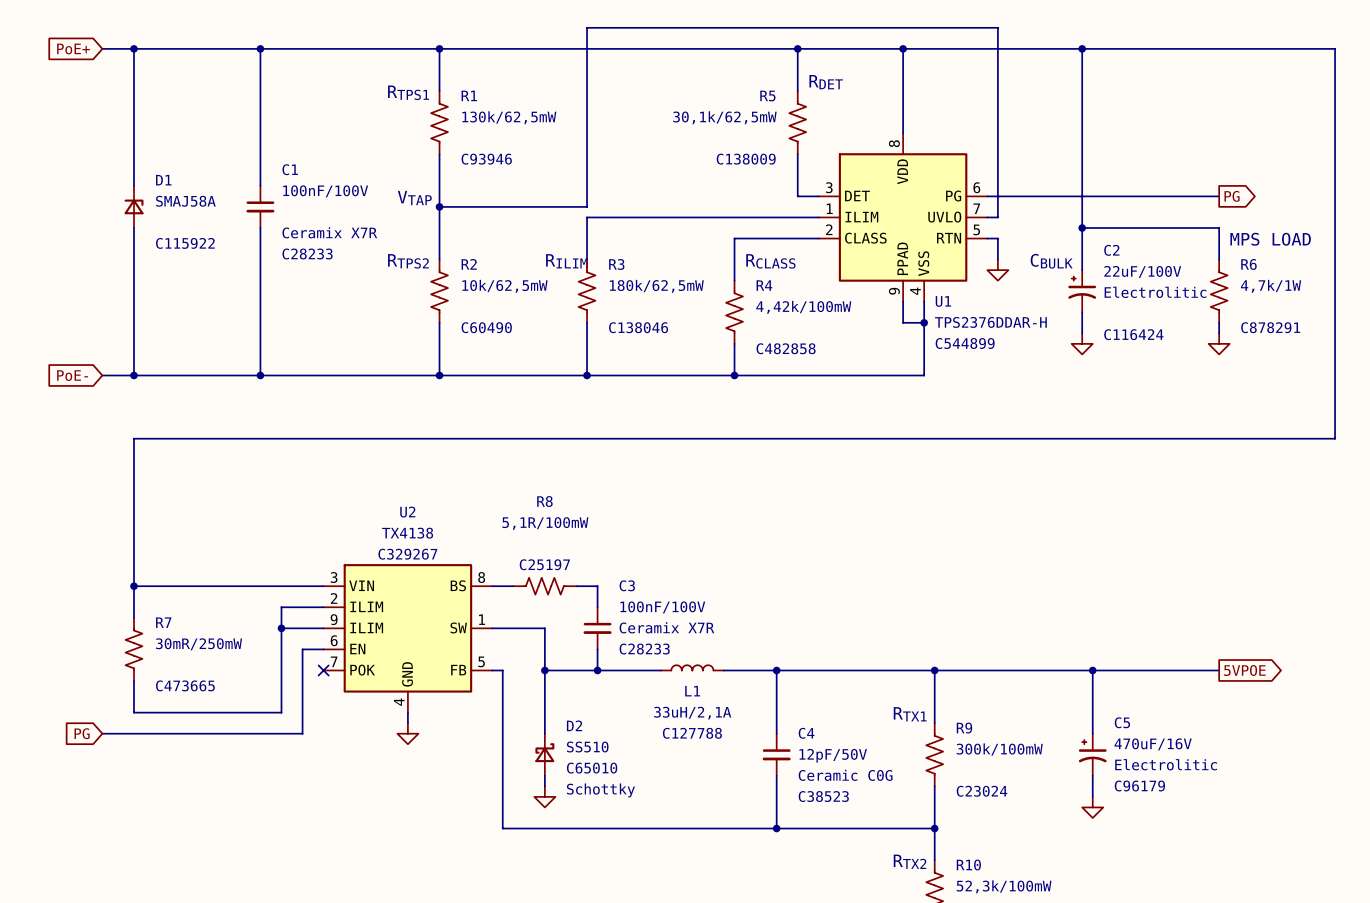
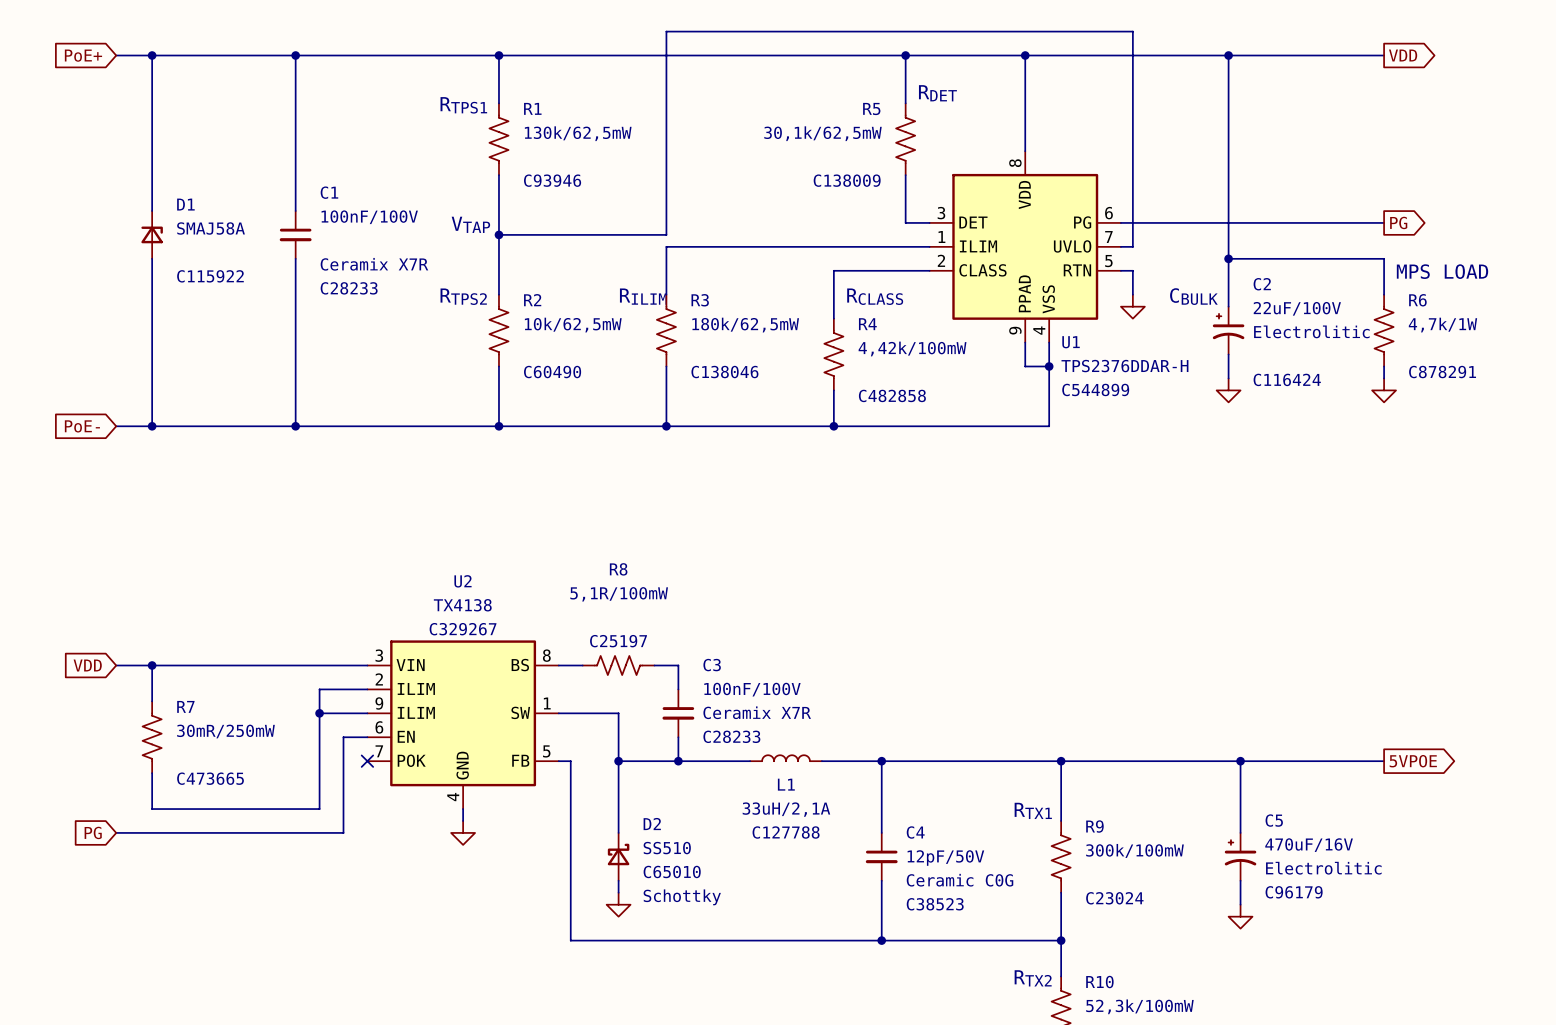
wire: (1219, 48) (1335, 48) (1335, 438) (134, 438) (134, 586) -> (116, 665) (152, 665)
global label: none -> VDD (1403, 55)
global label: none -> VDD (87, 665)

